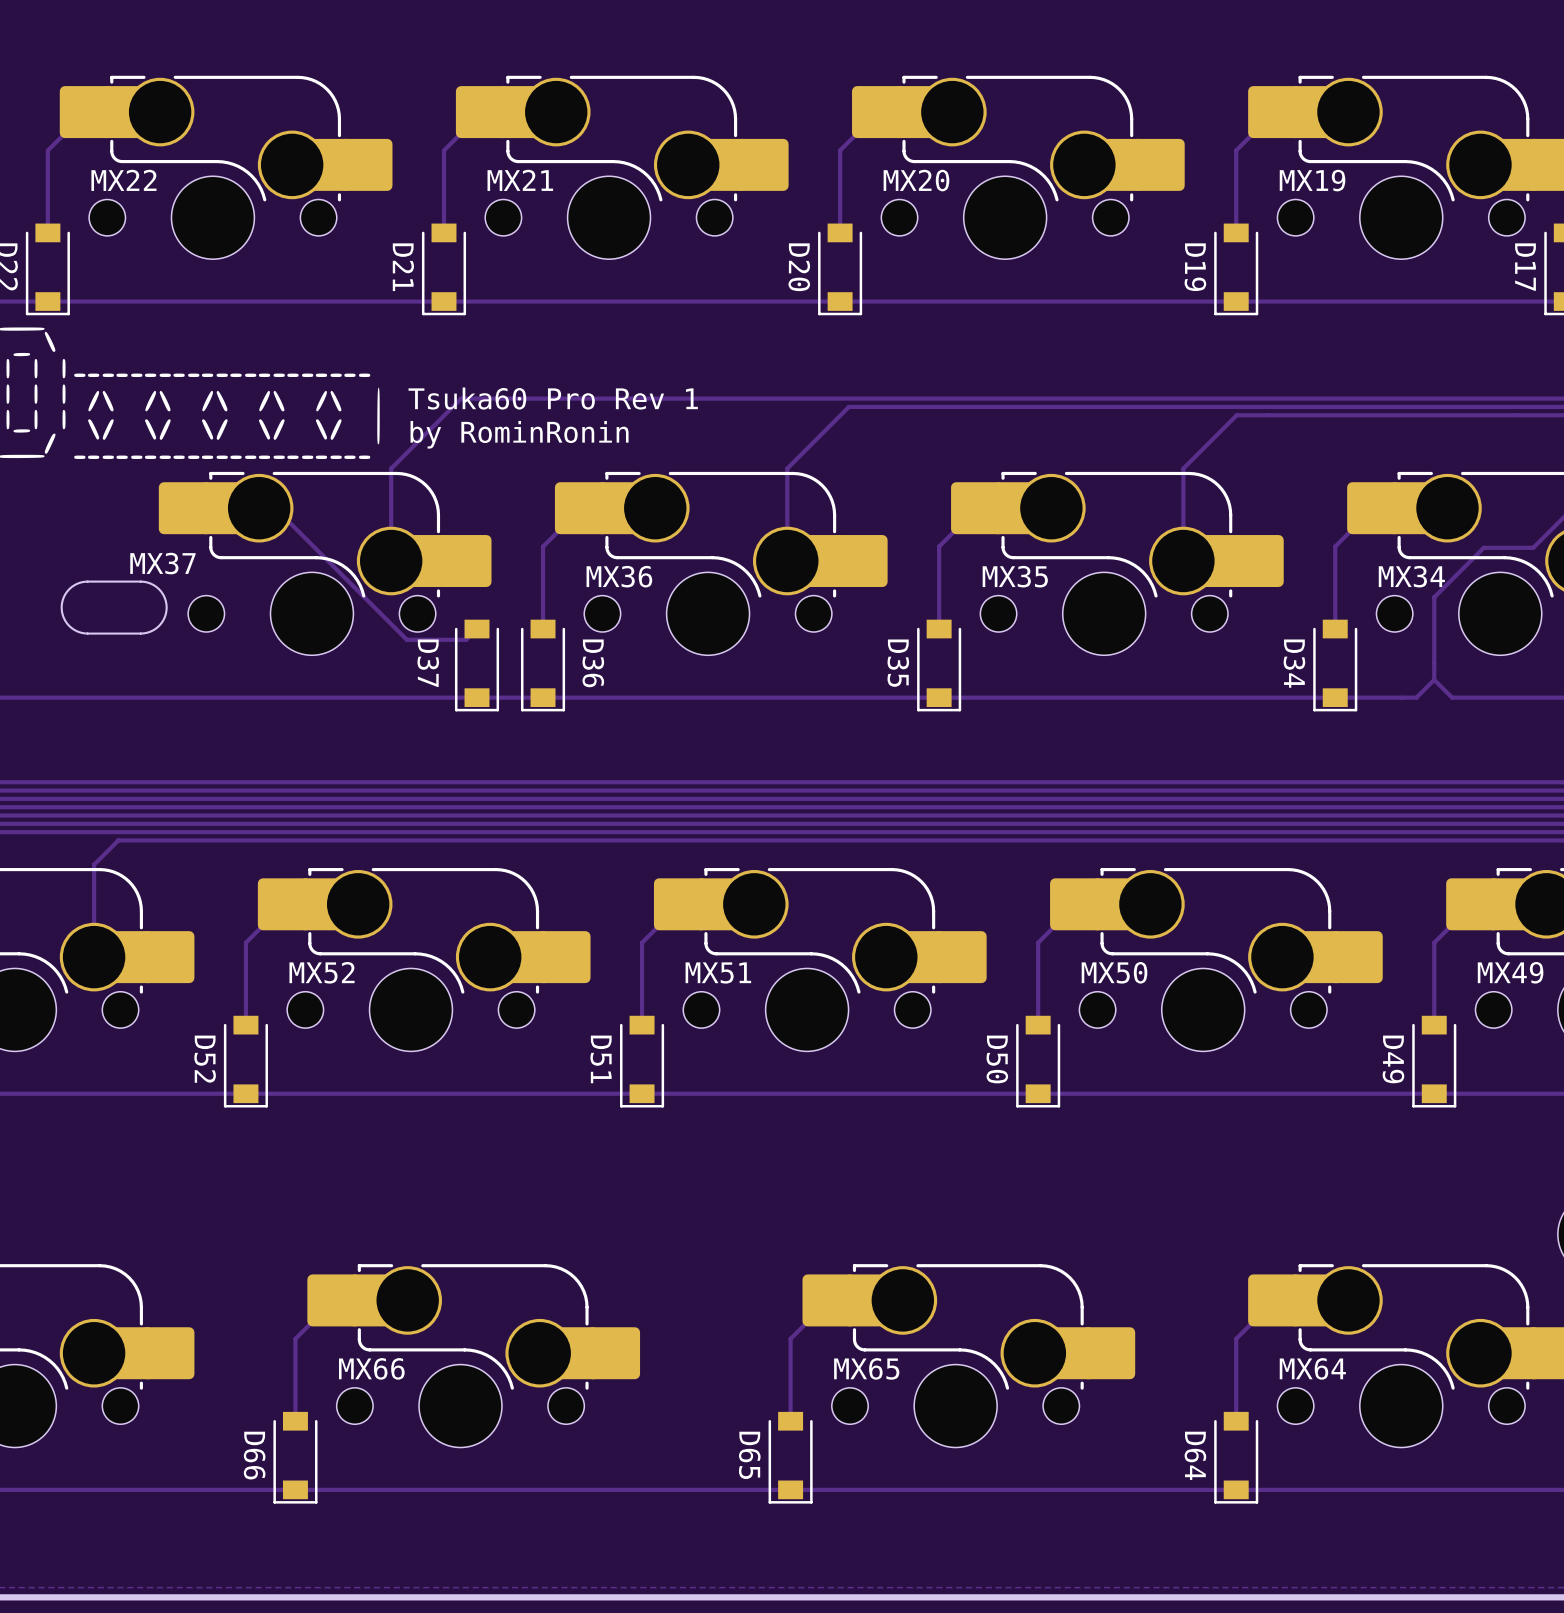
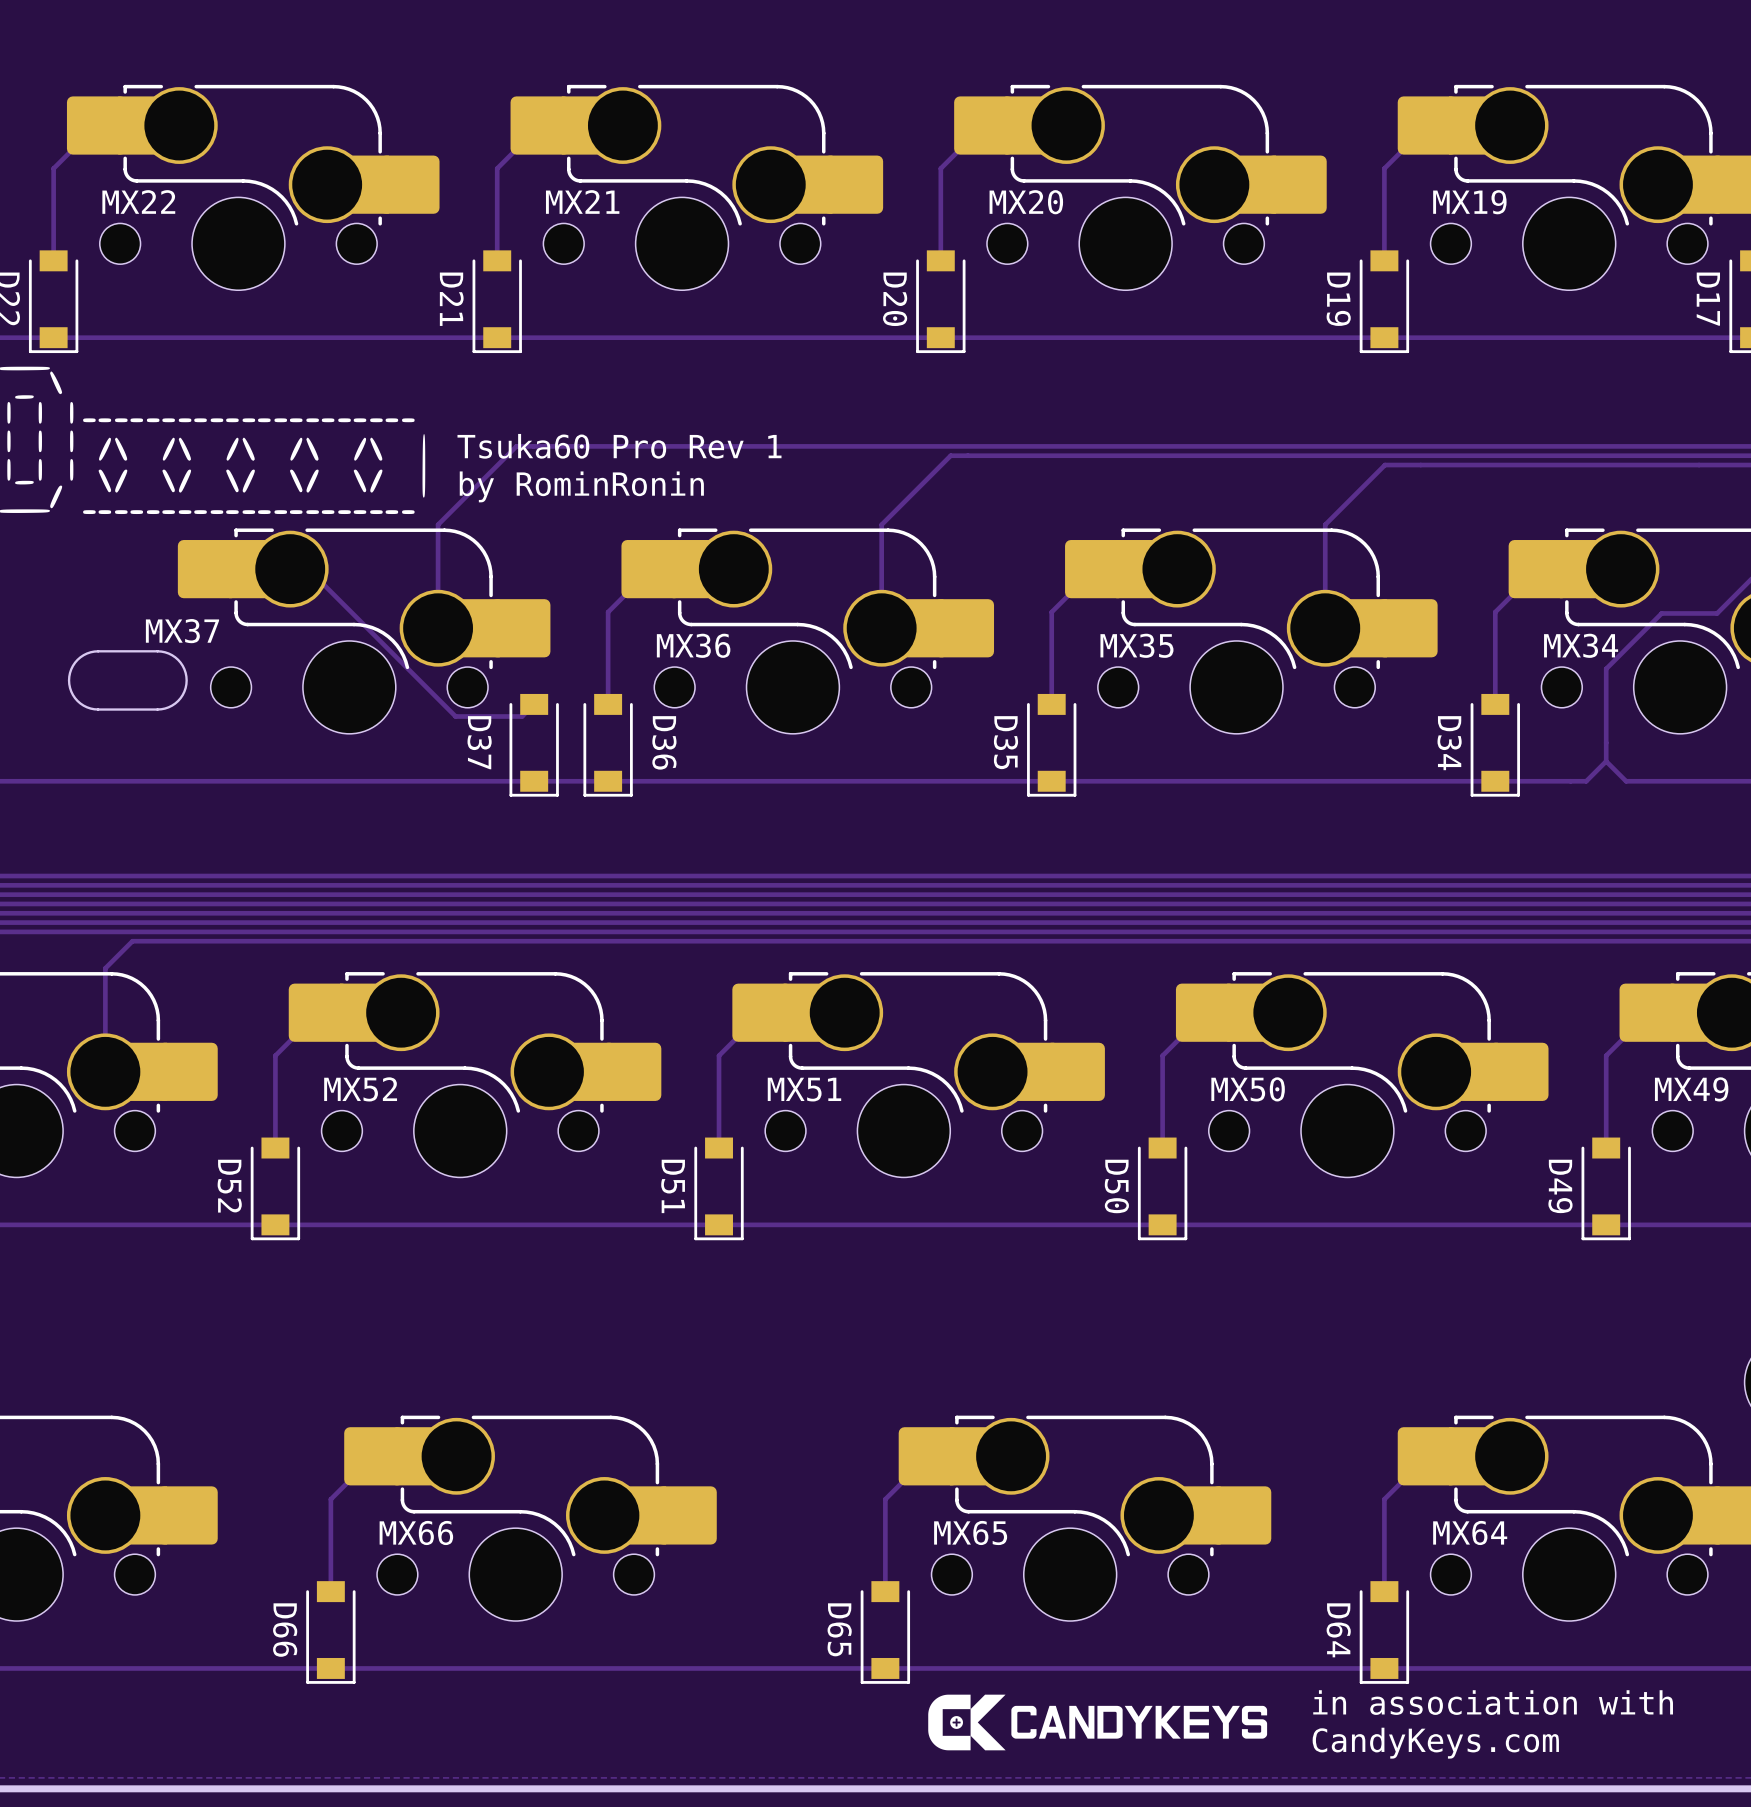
drawing: none -> [928, 1694, 1268, 1751]
text: none -> in association with (1493, 1702)
text: none -> CandyKeys.com (1435, 1743)

